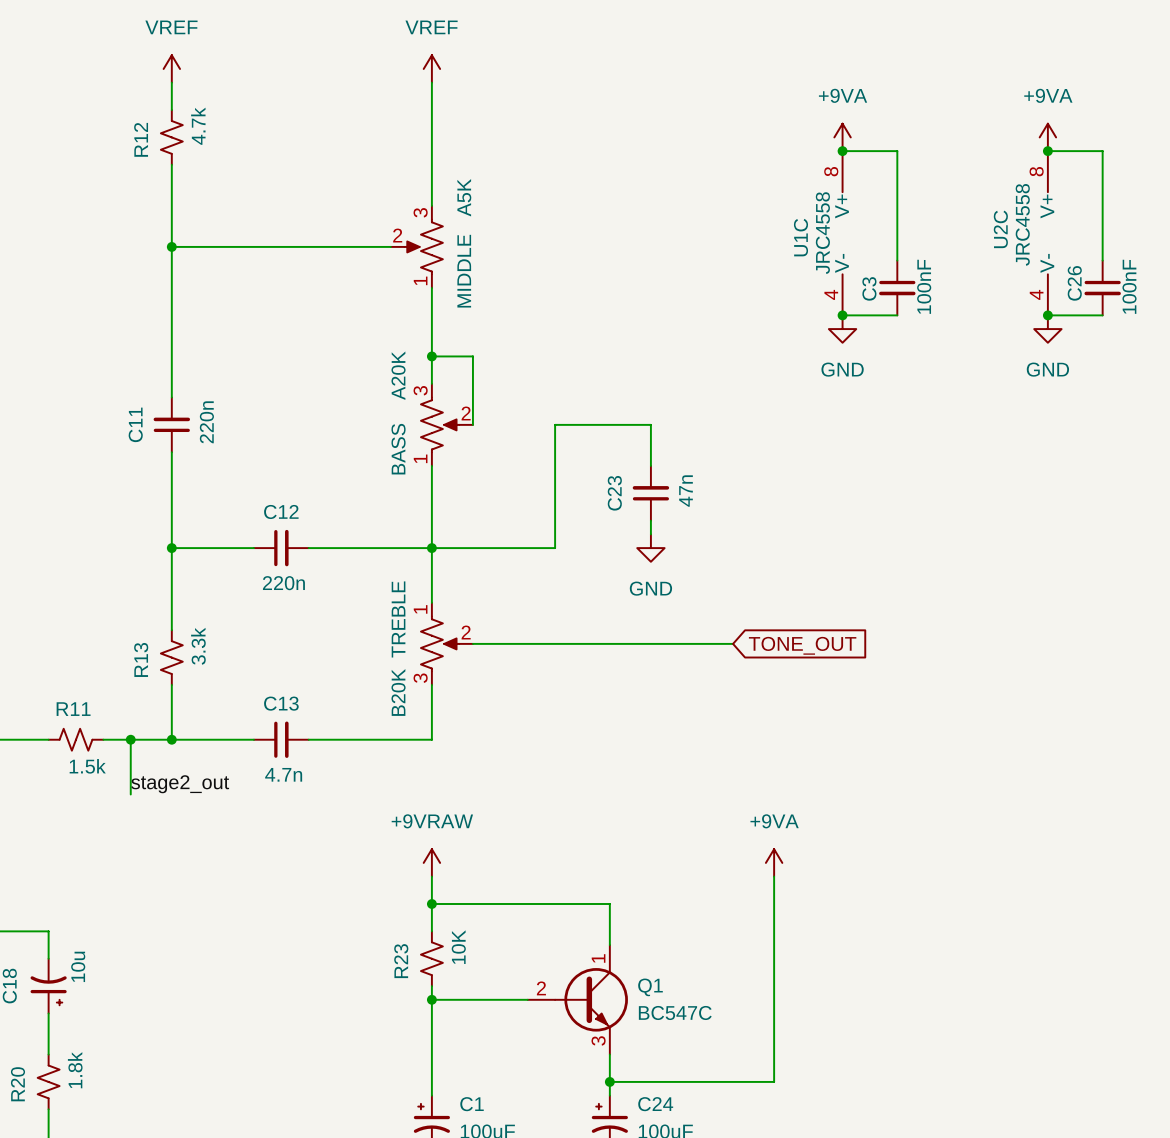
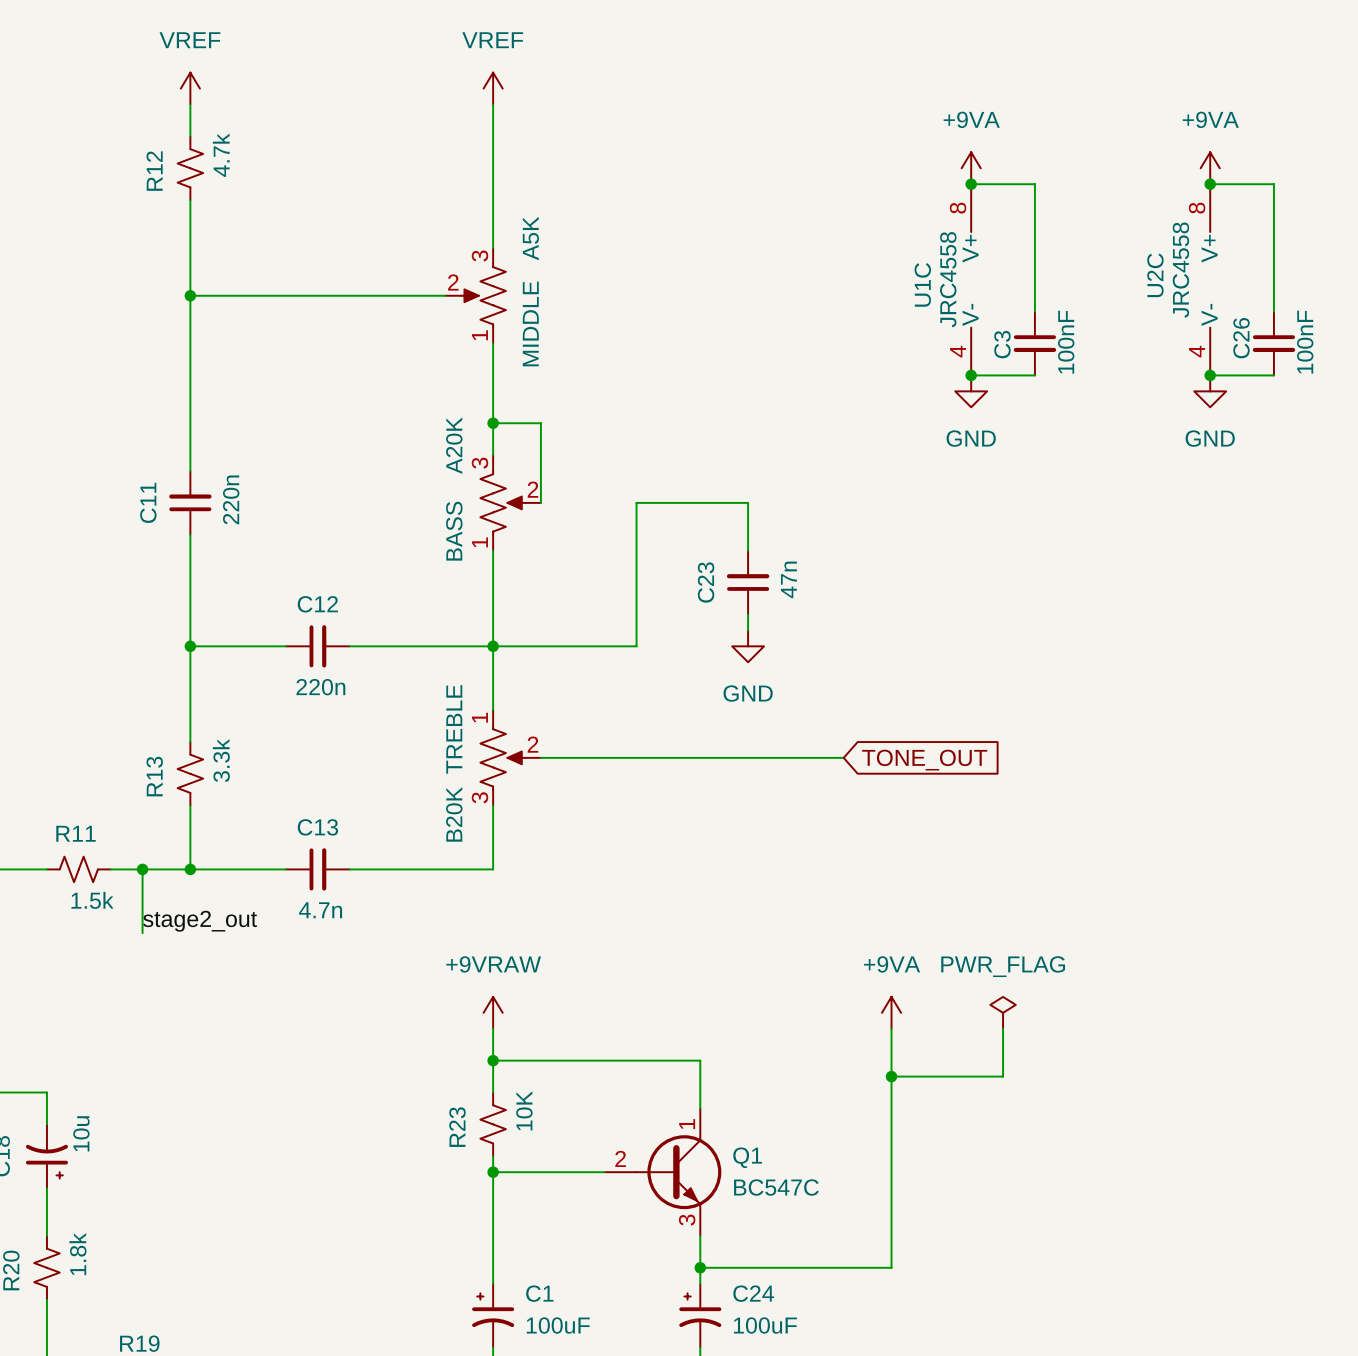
power symbol: none -> PWR_FLAG (1003, 1012)
wire: none -> (1003, 1028) (1003, 1076) (891, 1076)
junction: none -> (891, 1076)

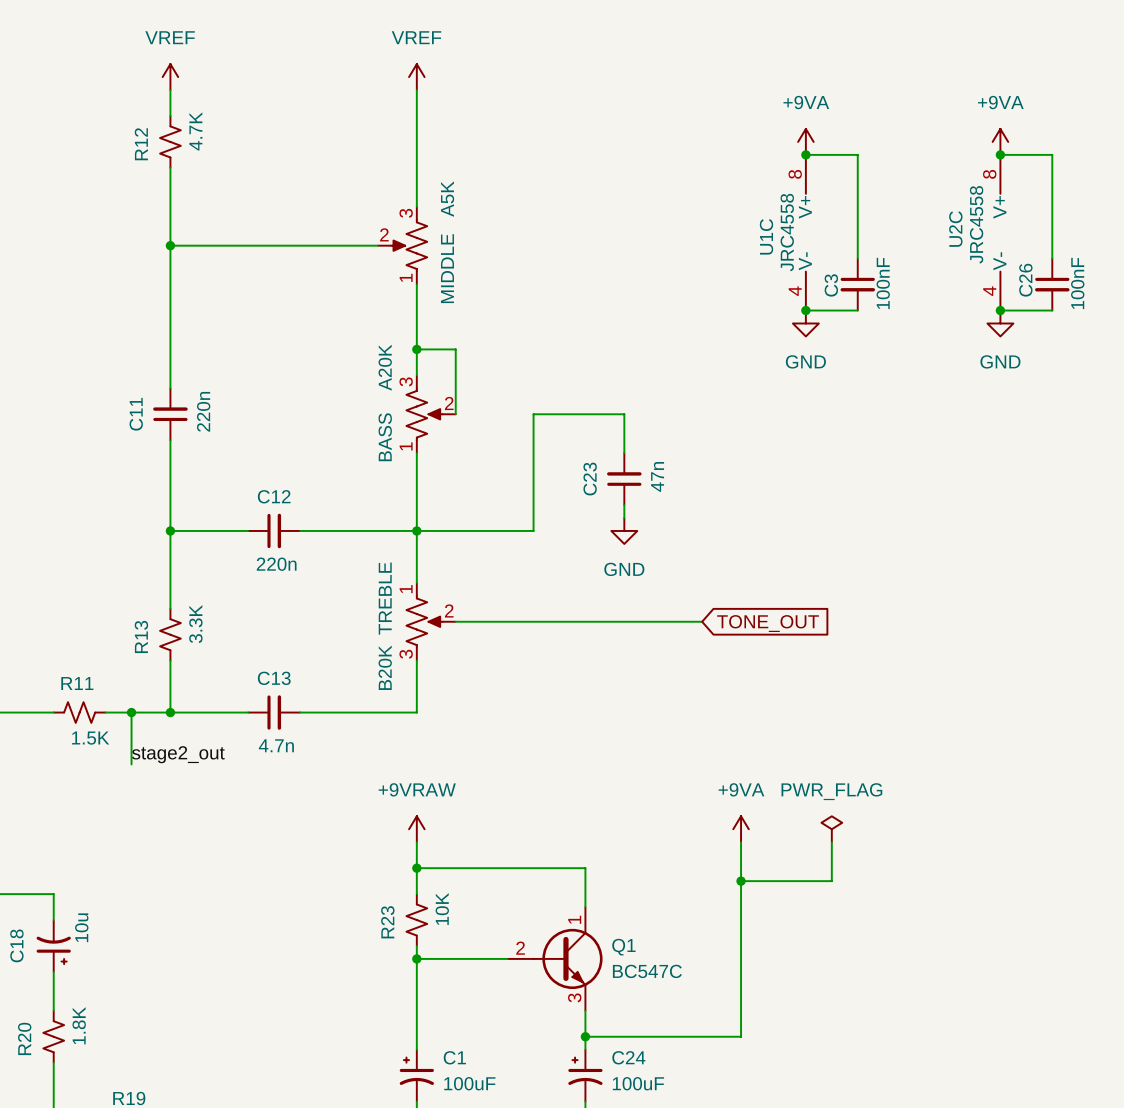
R12 value: 4.7k (221, 155) -> 4.7K (195, 131)
R13 value: 3.3k (221, 760) -> 3.3K (195, 624)
R11 value: 1.5k (92, 900) -> 1.5K (90, 738)
R20 value: 1.8k (77, 1254) -> 1.8K (79, 1025)

